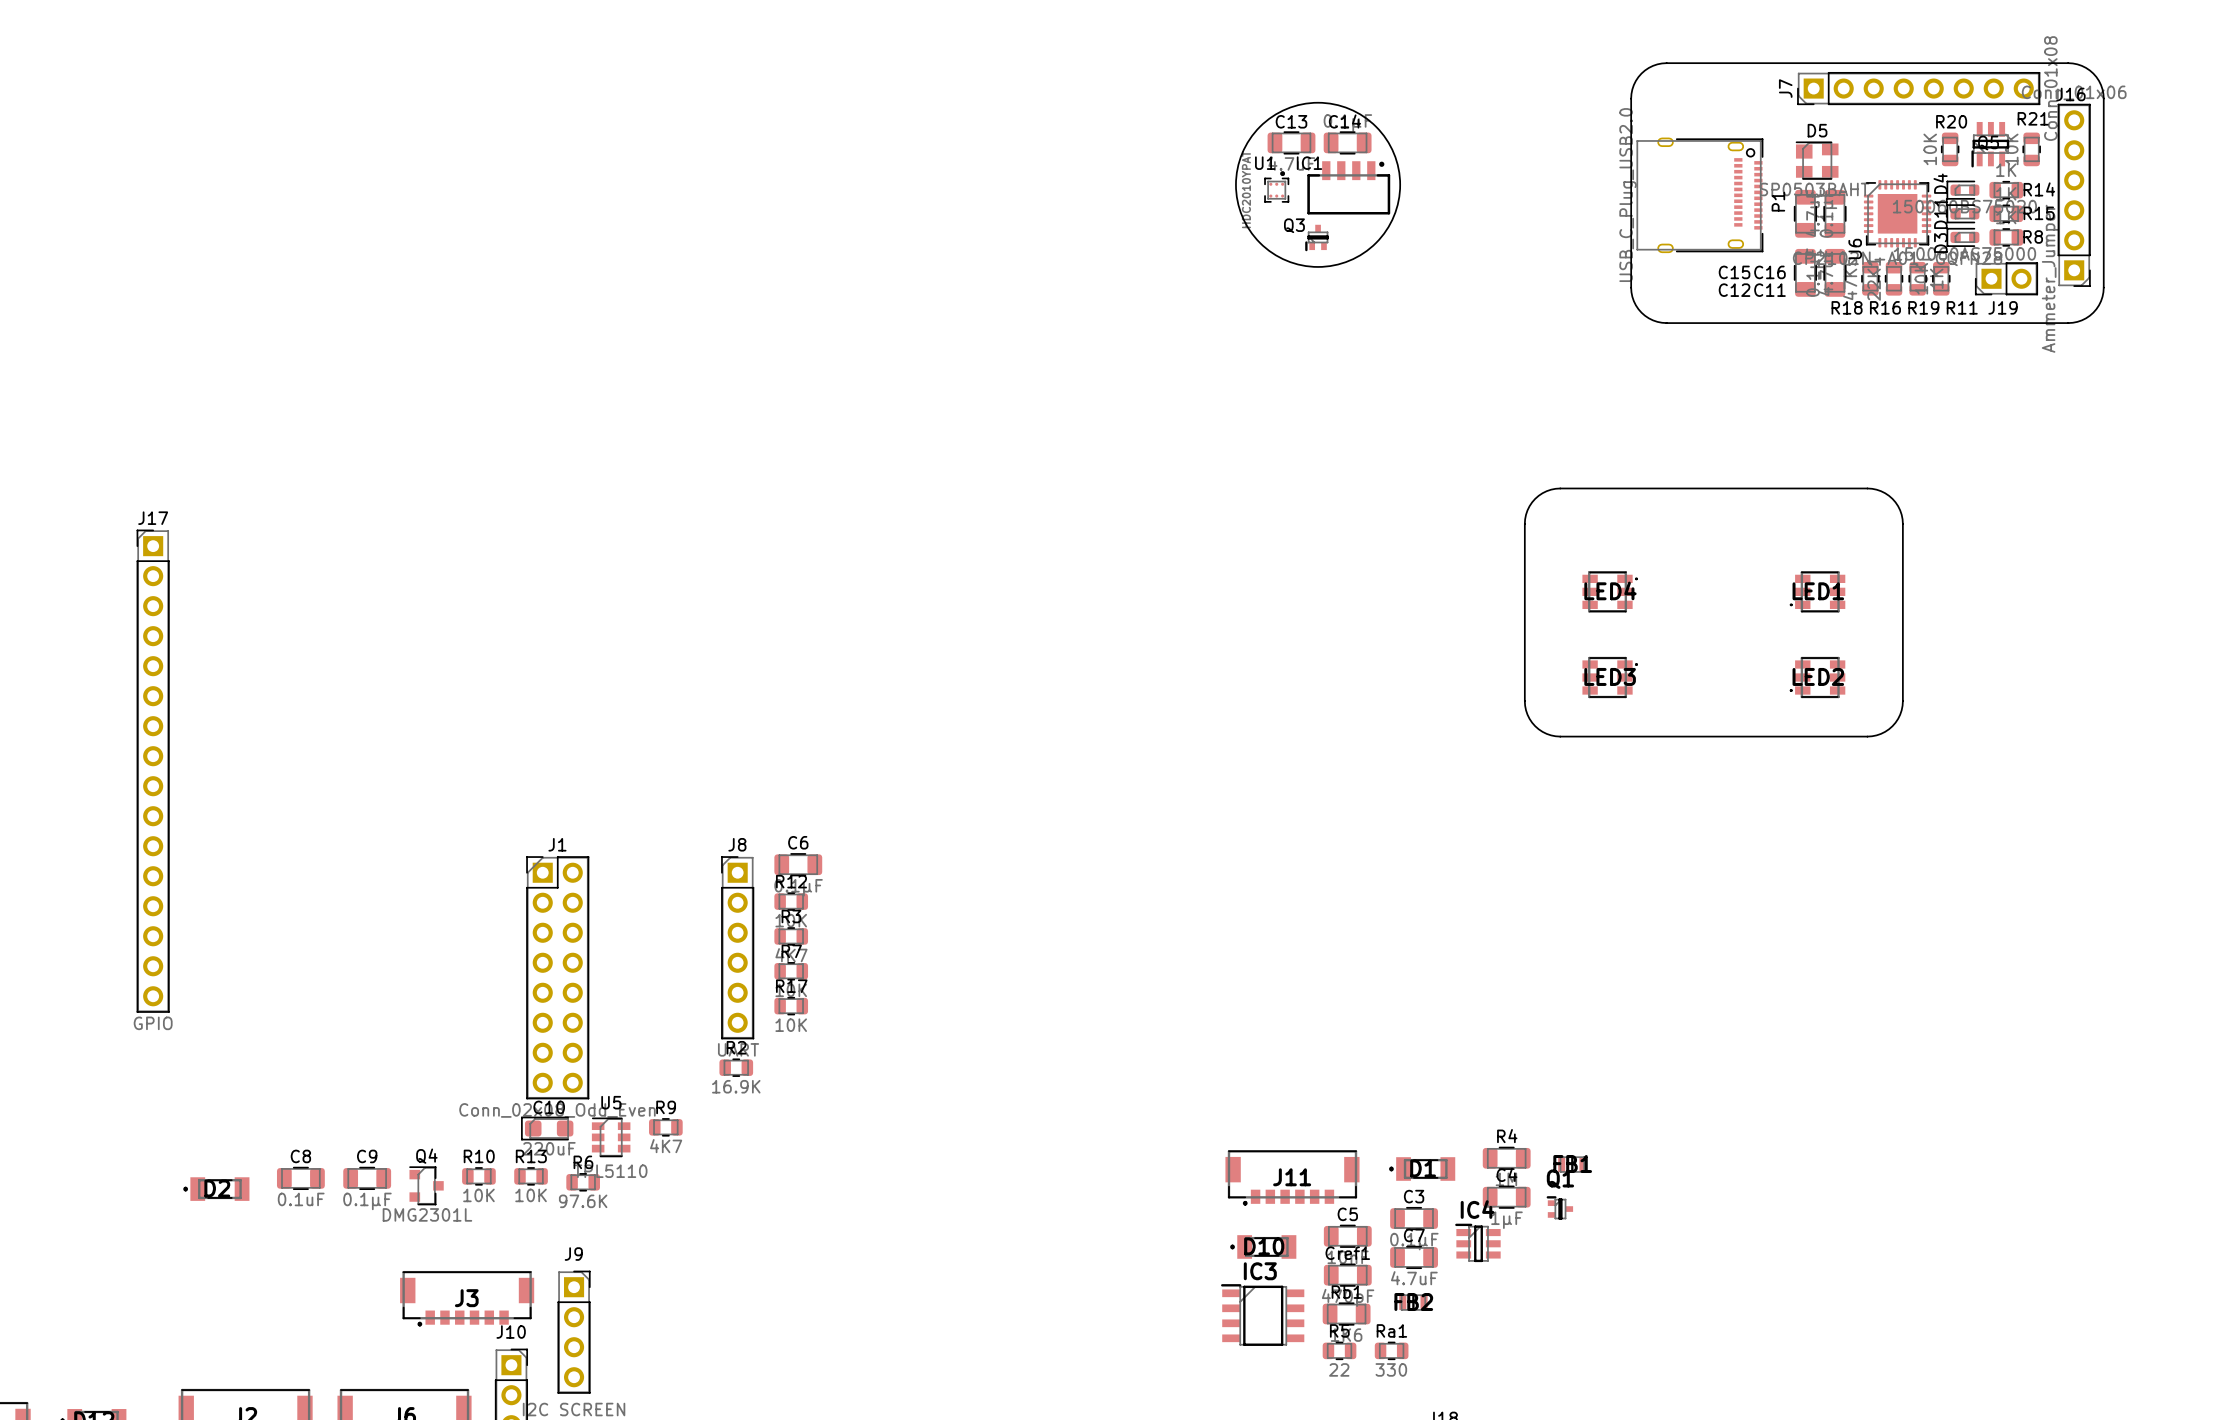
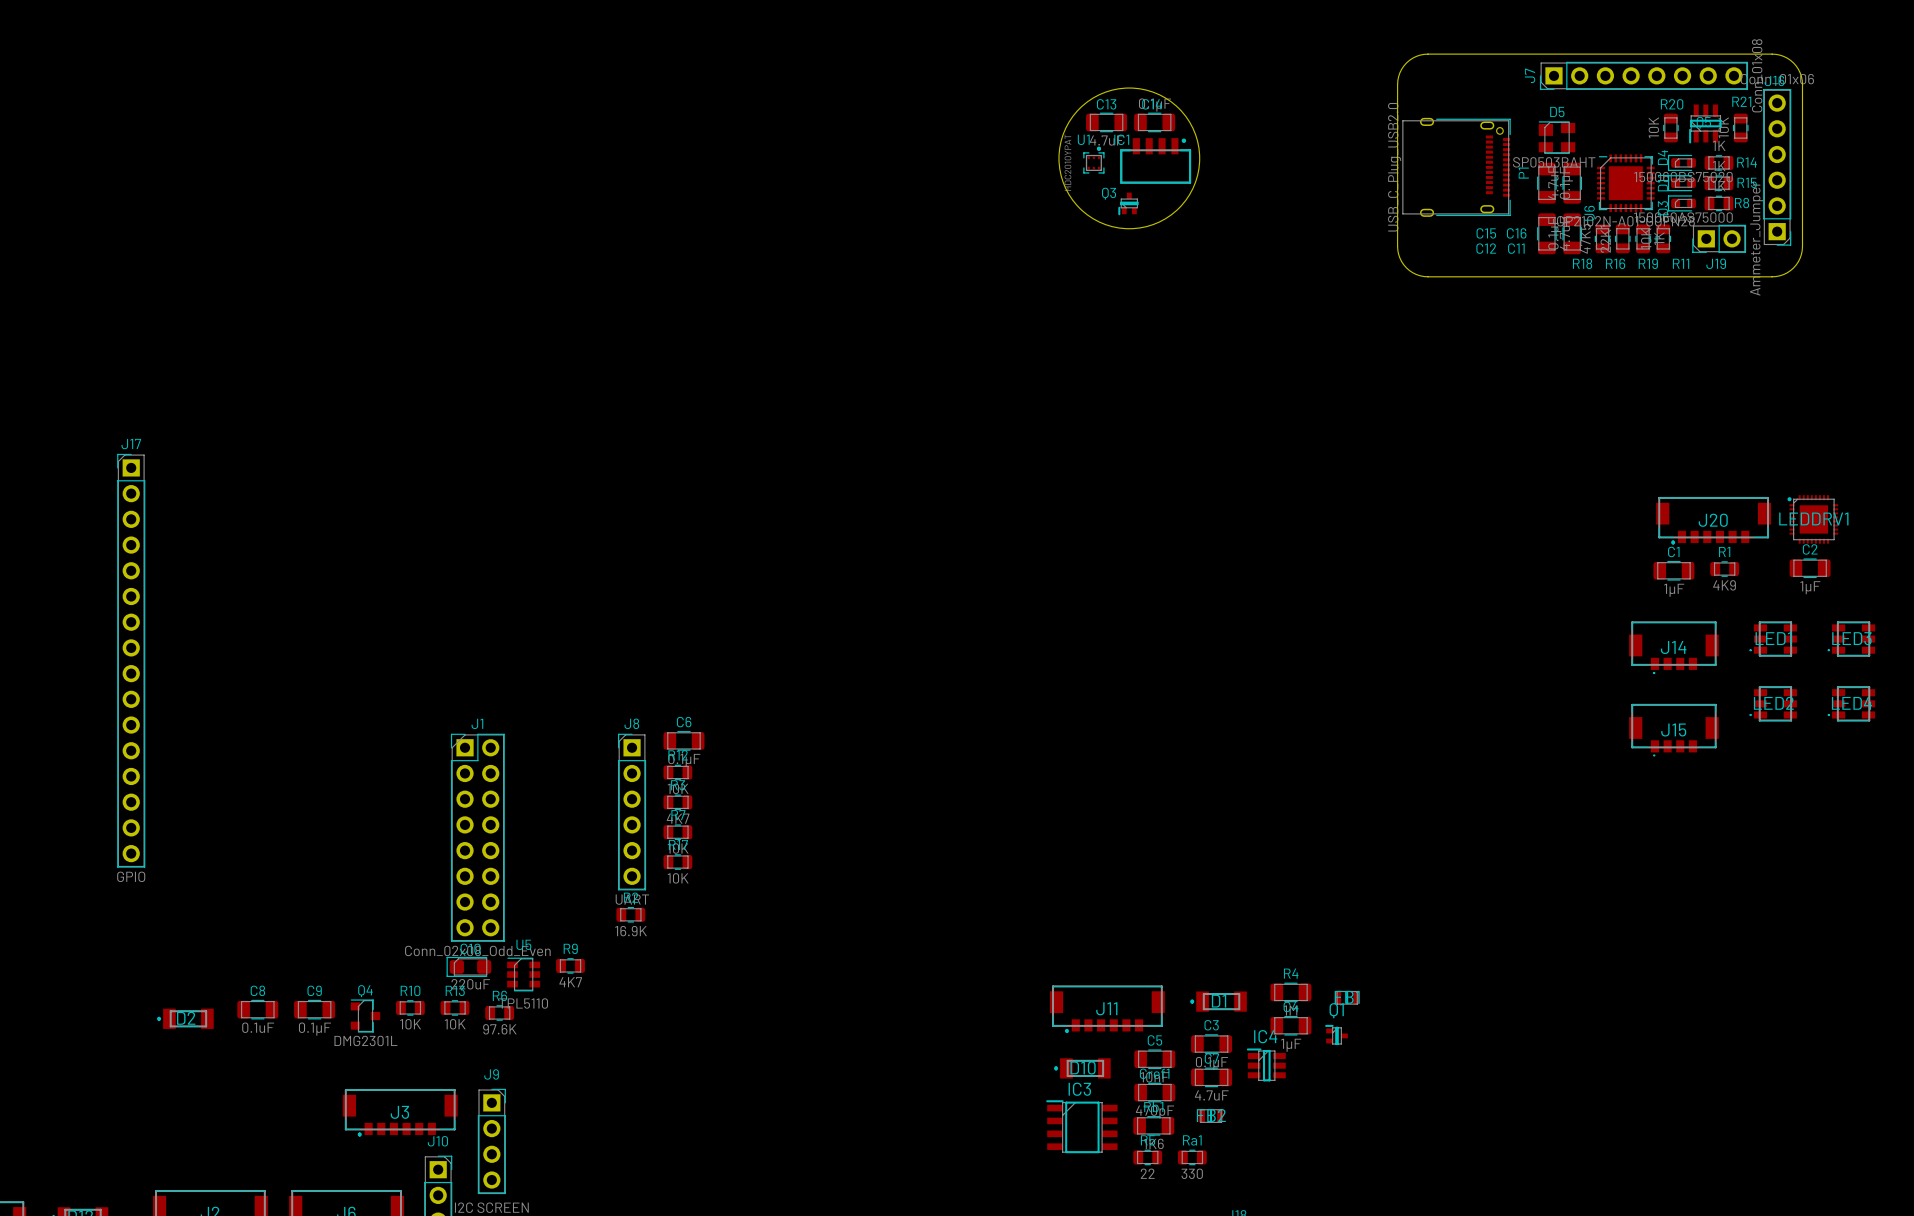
board edge: (1560, 488) (1867, 488) (1876, 489) (1889, 495) (1900, 510) (1902, 523) (1902, 701) (1900, 714) (1895, 722) (1881, 733) (1867, 736) (1560, 736) (1546, 733) (1538, 729) (1527, 714) (1524, 701) (1525, 519) (1529, 506) (1538, 495) (1551, 489) (1560, 488) -> none
LED4 rotation: 0° (1610, 591) -> 180° (1851, 703)
LED4 position: (1610, 591) -> (1851, 703)
LED1 position: (1817, 591) -> (1773, 639)
LEDDRV1: none -> (1812, 519)
J20: none -> (1713, 520)
C2: none -> 1μF (1810, 568)
R1: none -> 4K9 (1724, 569)
C1: none -> 1μF (1673, 570)
LED3 rotation: 0° (1610, 677) -> 180° (1851, 639)
LED3 position: (1610, 677) -> (1851, 639)
LED2 position: (1817, 677) -> (1773, 703)
J14: none -> (1673, 647)
J15: none -> (1673, 730)

